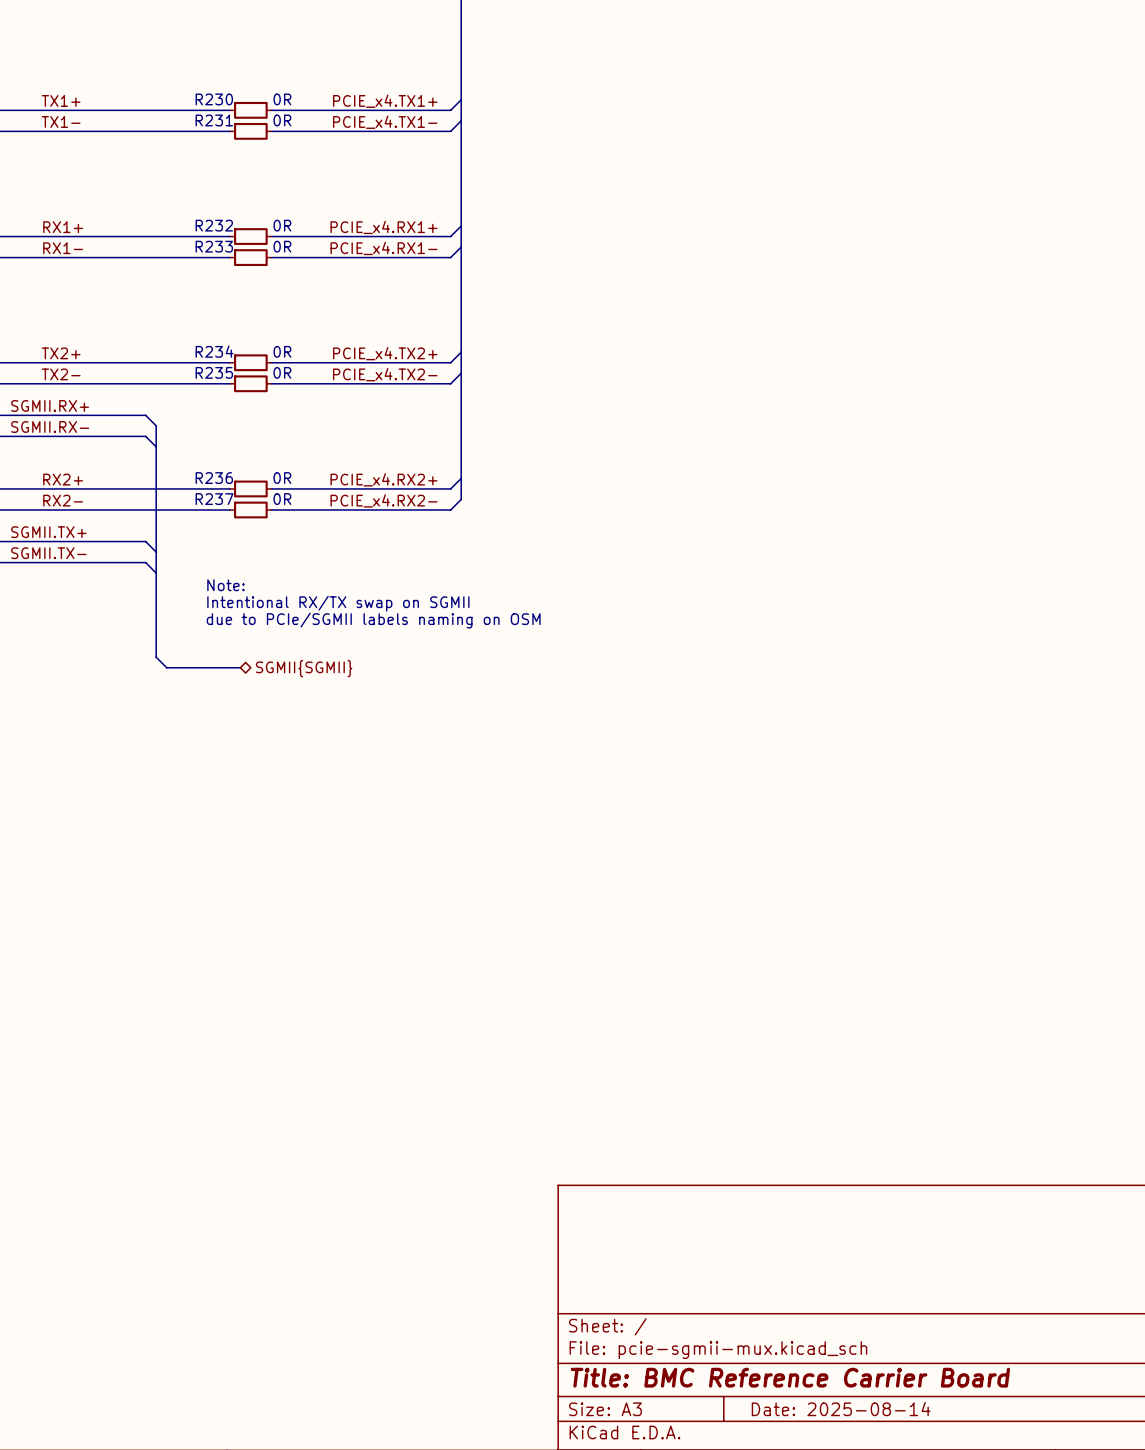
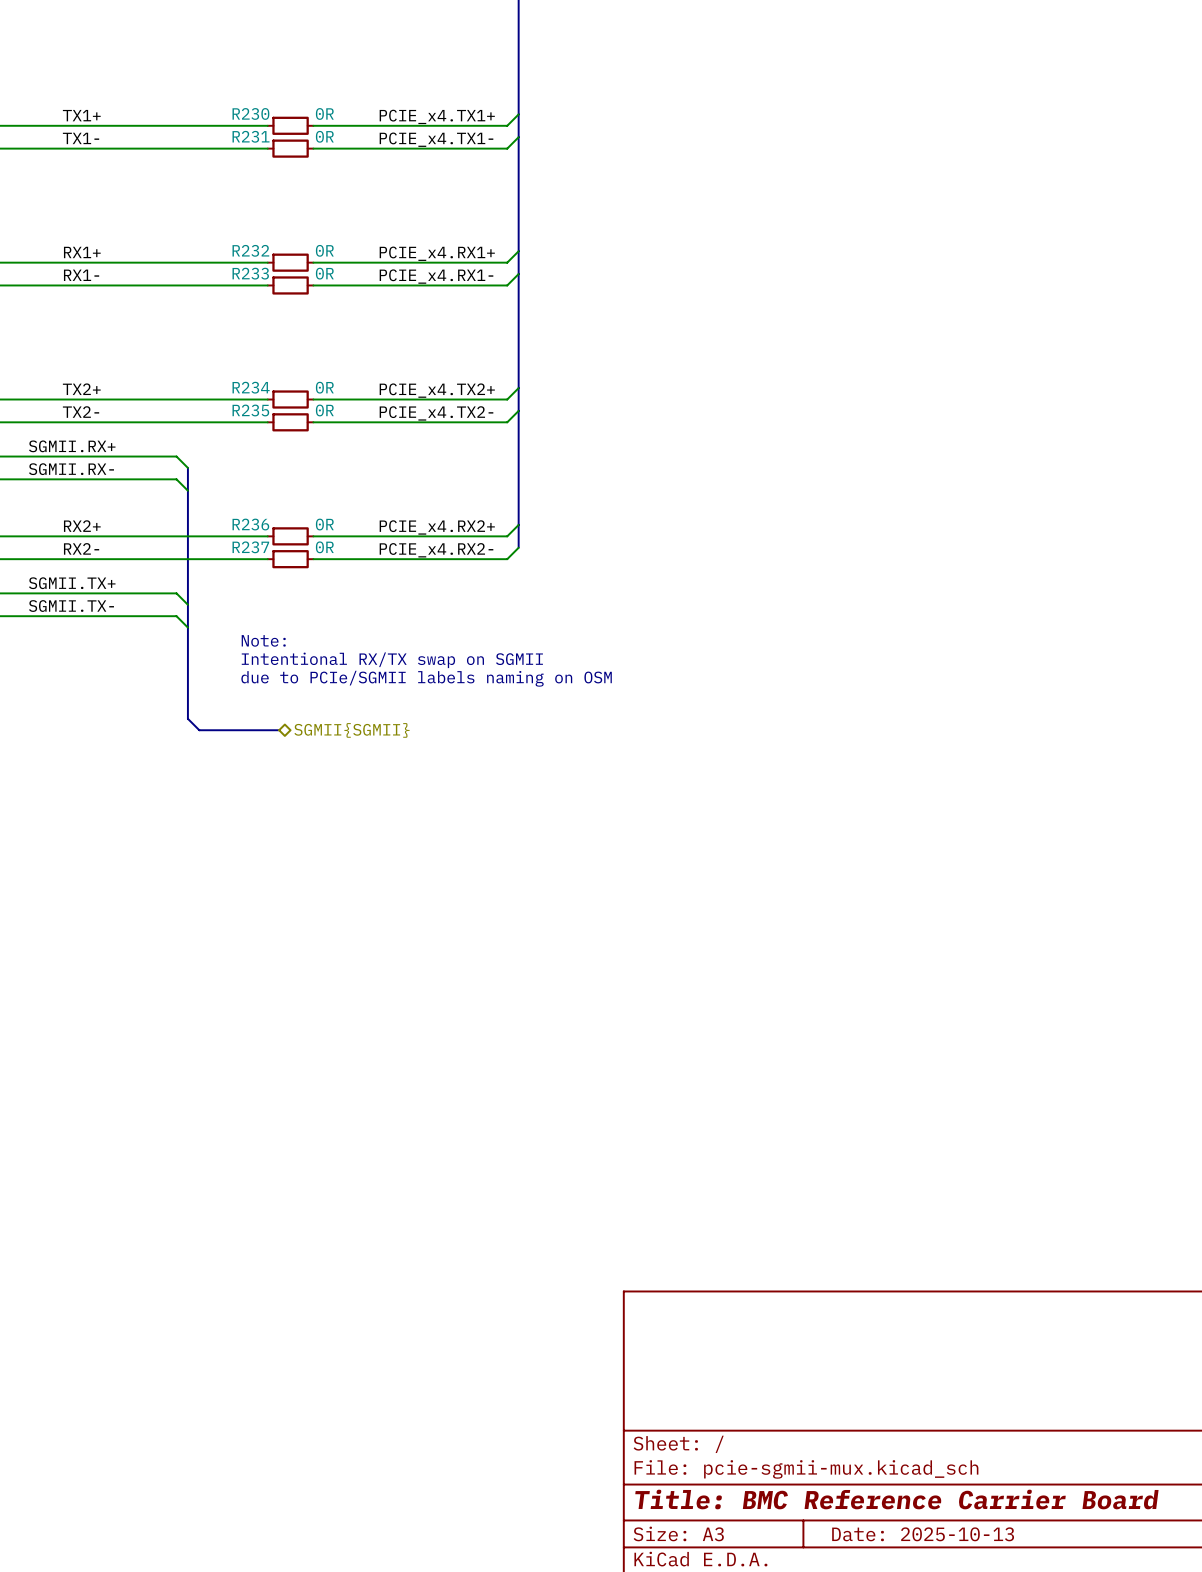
title block: Date: 2025-08-14 (841, 1409) -> Date: 2025-10-13 (923, 1534)

